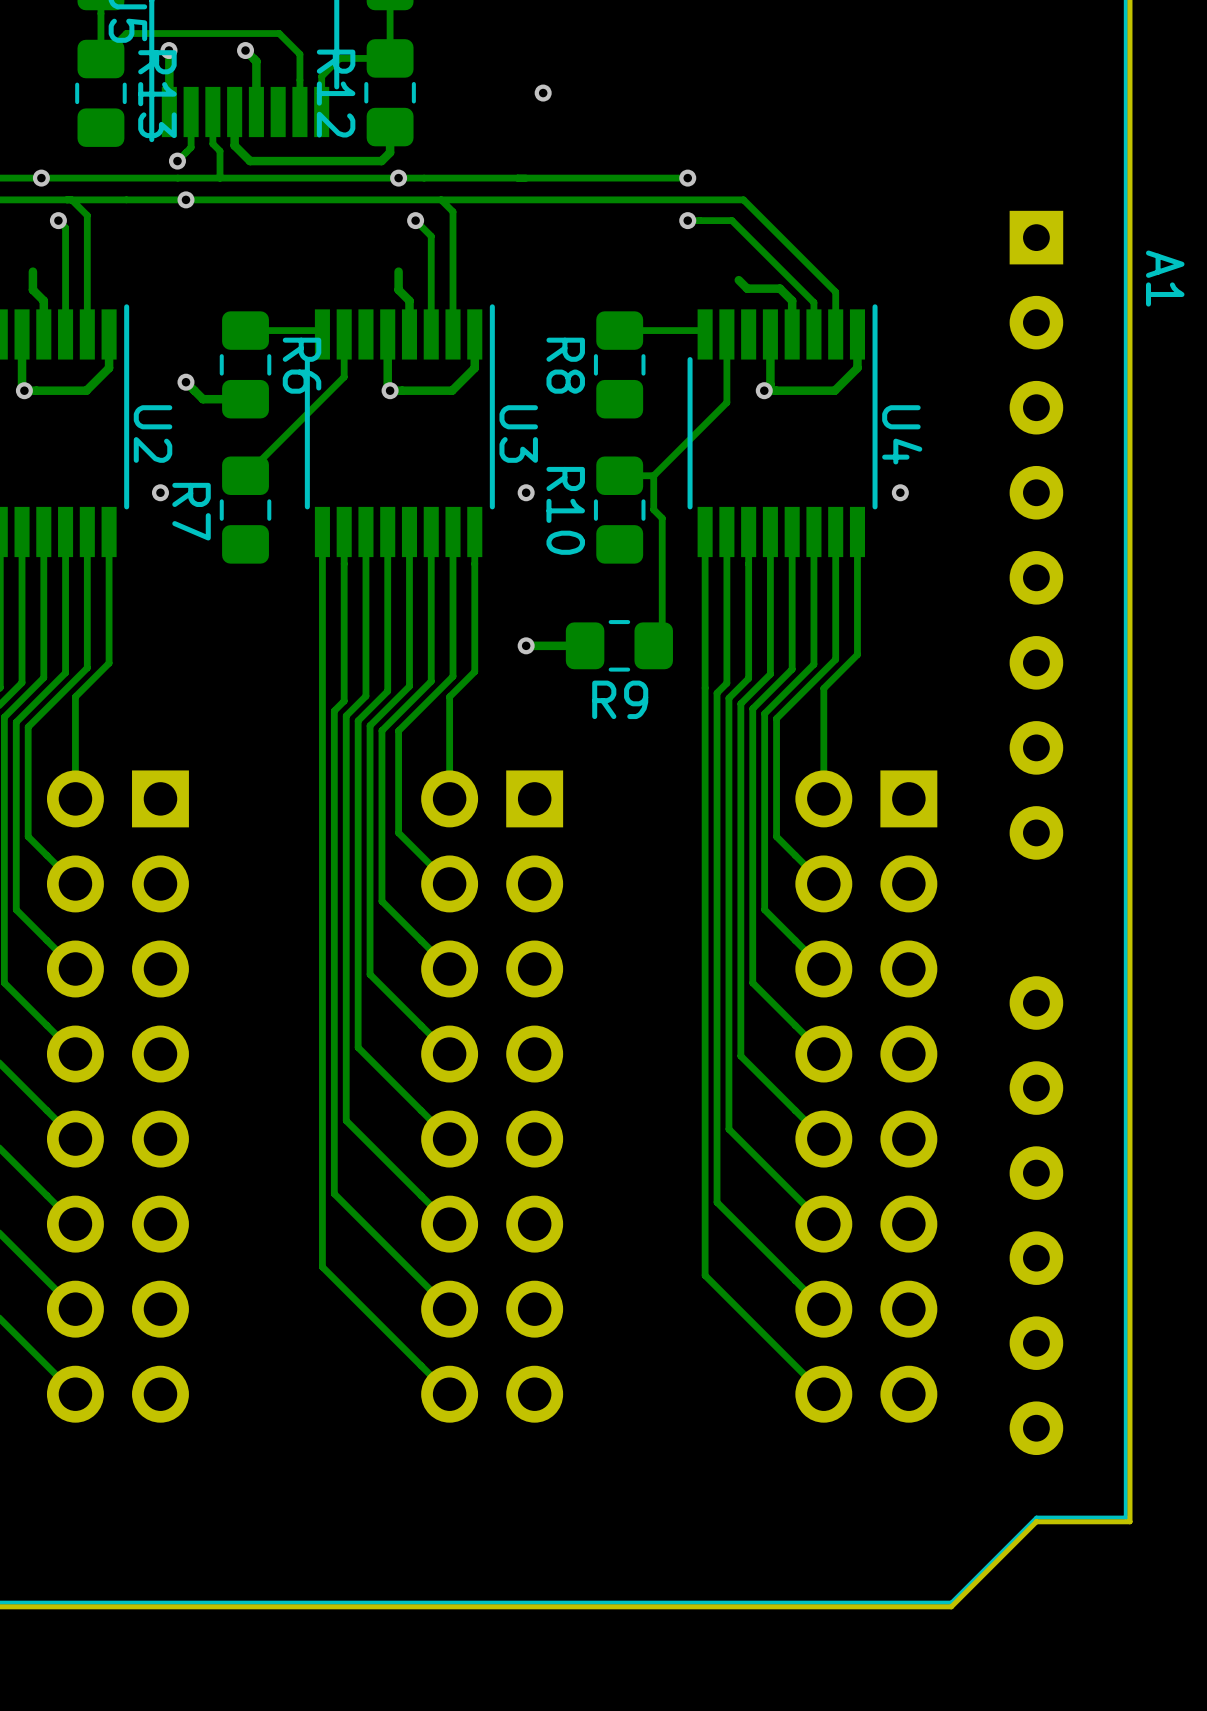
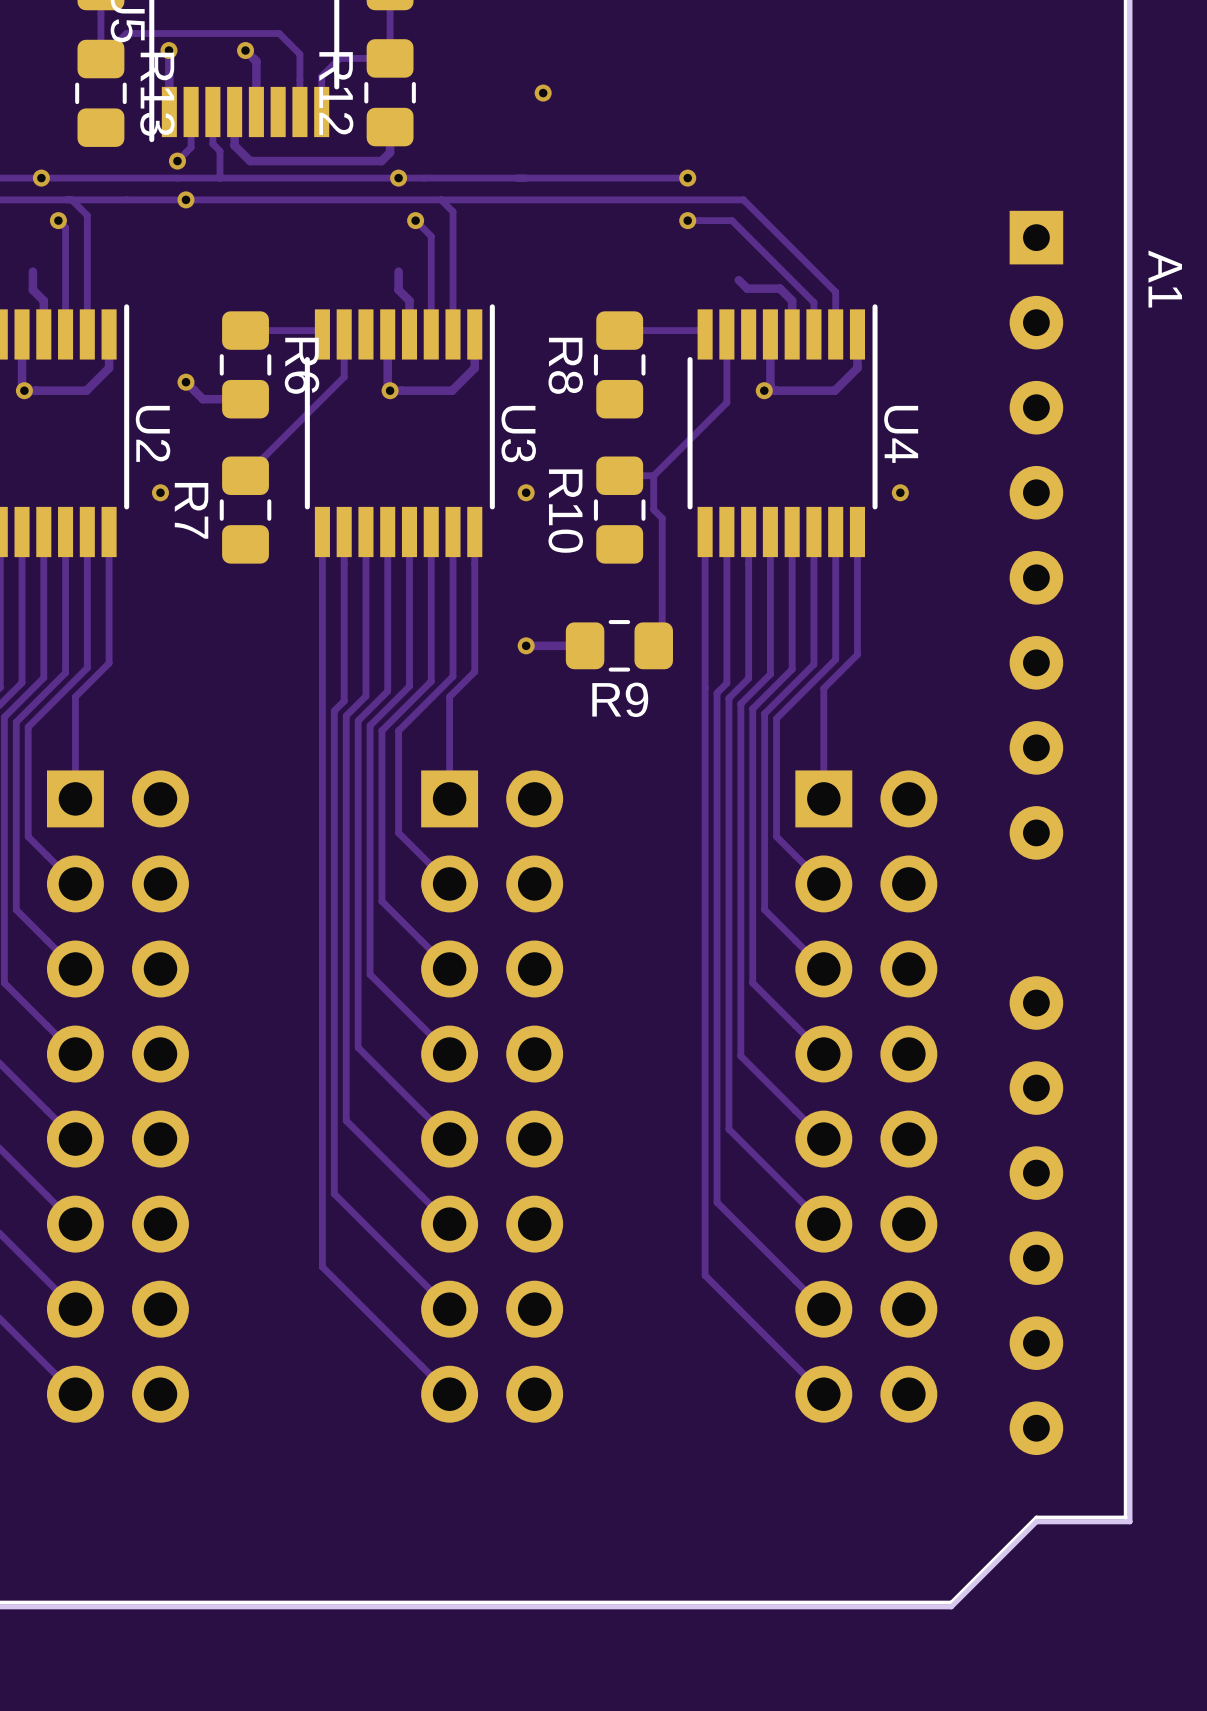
part footprint: [46, 770, 189, 1423] -> [46, 770, 189, 1423]
part footprint: [421, 770, 564, 1423] -> [421, 770, 564, 1423]
part footprint: [795, 770, 938, 1423] -> [795, 770, 938, 1423]

